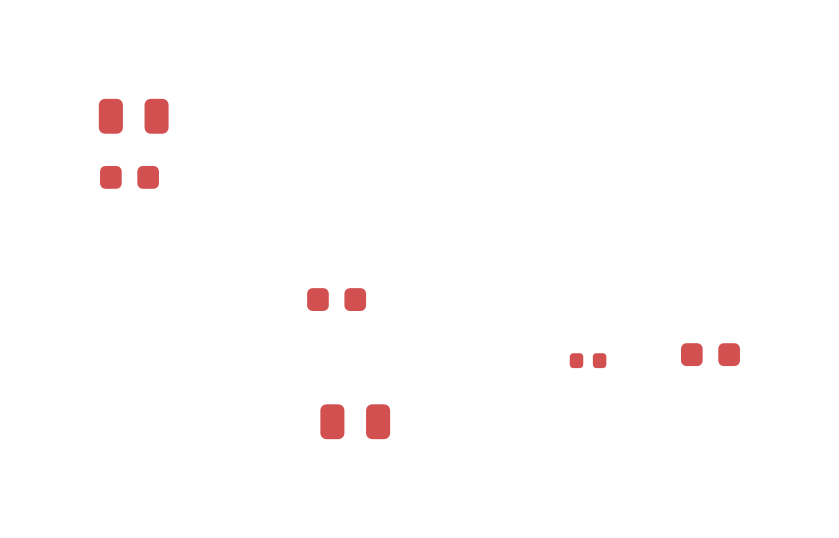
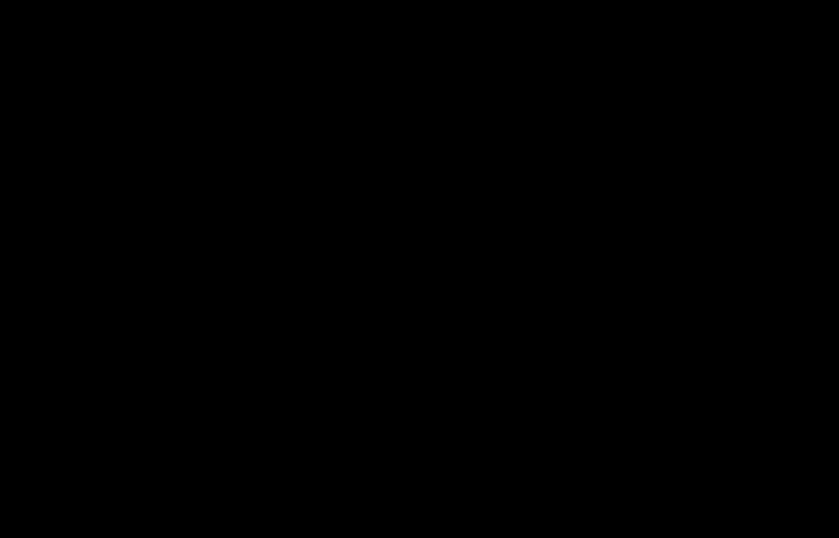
part: (133, 116) -> none
part: (129, 177) -> none
part: (336, 299) -> none
part: (710, 354) -> none
part: (588, 360) -> none
part: (355, 421) -> none

